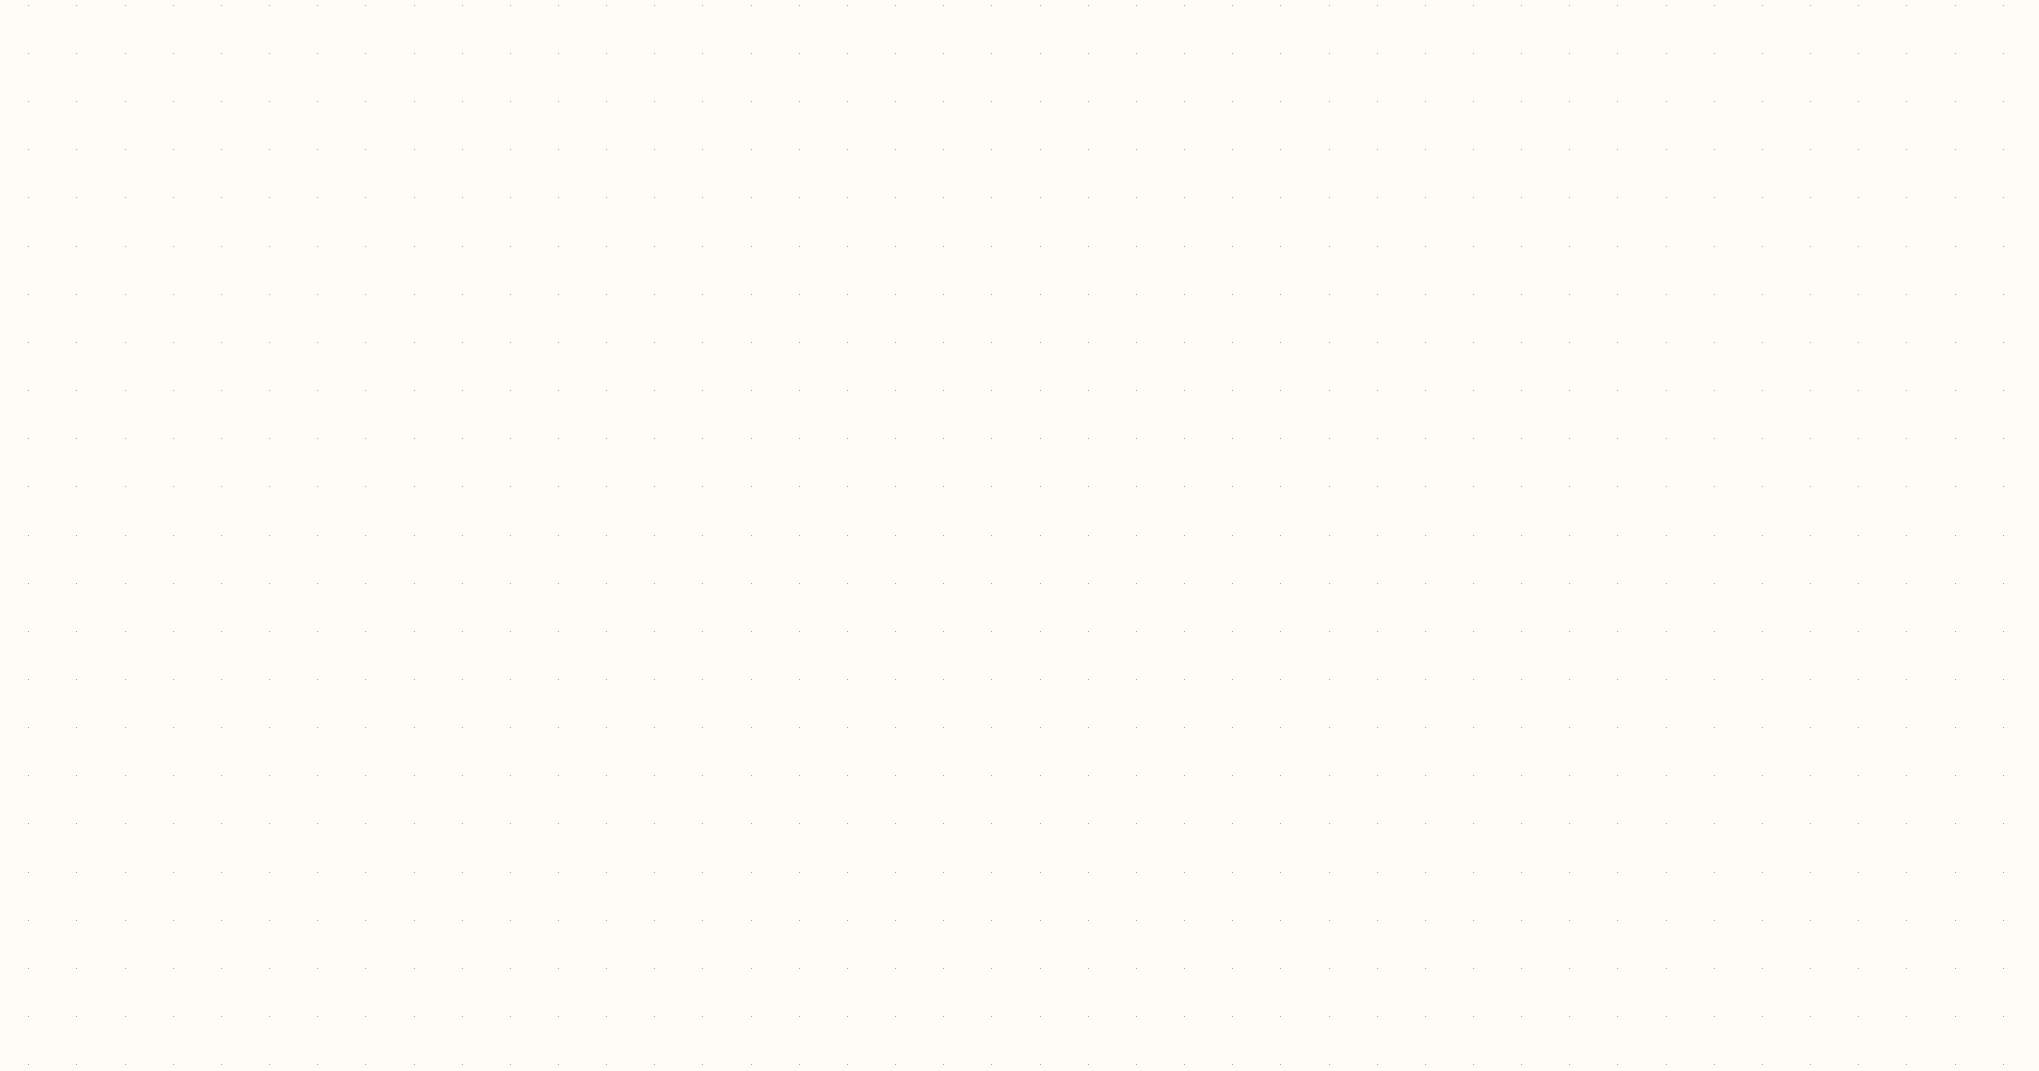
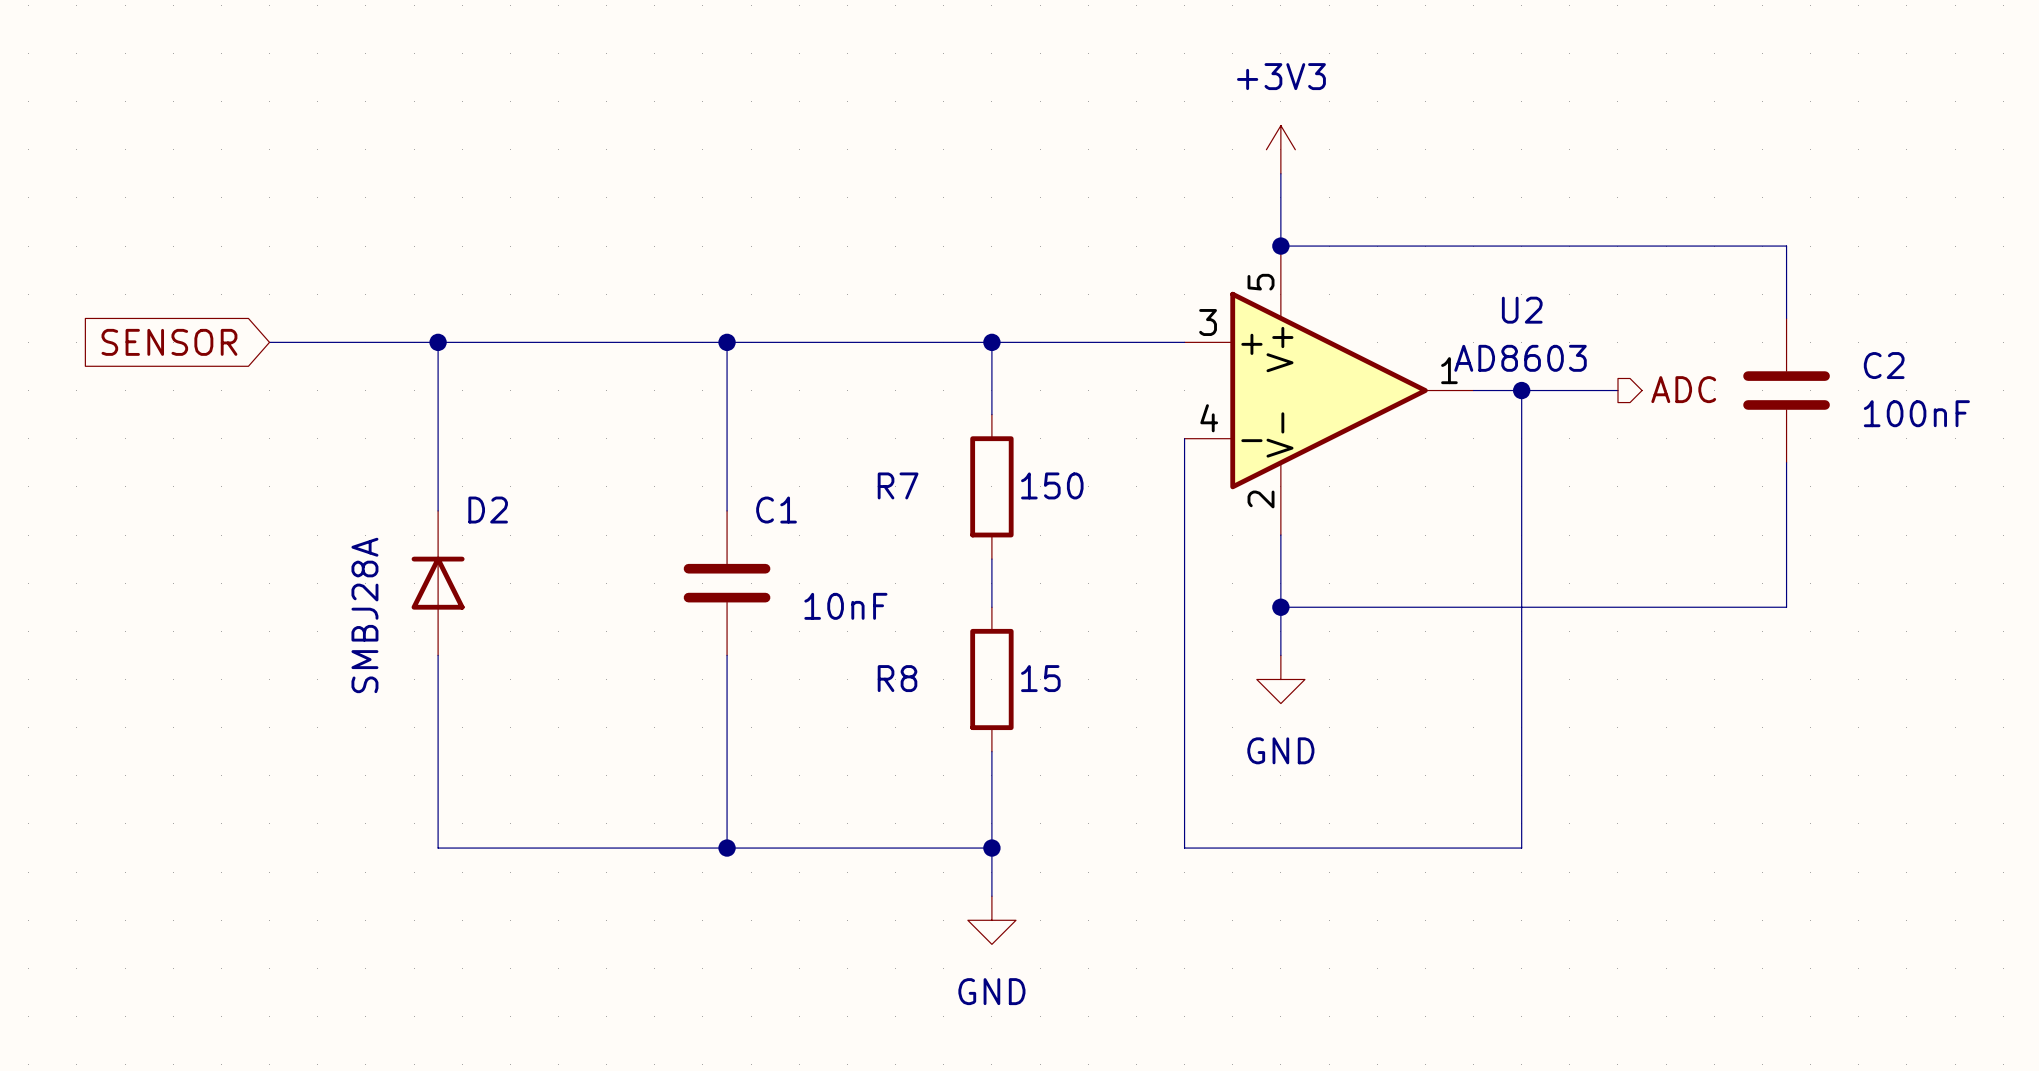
power symbol: none -> +3V3 (1280, 149)
wire: none -> (1280, 173) (1280, 246) (1786, 246) (1786, 318)
junction: none -> (1280, 246)
global label: none -> SENSOR (169, 342)
wire: none -> (269, 342) (1184, 342)
wire: none -> (438, 342) (438, 510)
junction: none -> (438, 342)
wire: none -> (727, 342) (727, 510)
junction: none -> (727, 342)
wire: none -> (991, 342) (991, 414)
junction: none -> (991, 342)
hierarchical label: none -> ADC (1683, 389)
U2: none -> AD8603 (1329, 390)
wire: none -> (1473, 390) (1617, 390)
wire: none -> (1521, 390) (1521, 848) (1184, 848) (1184, 438)
junction: none -> (1521, 390)
C2: none -> 100nF (1786, 390)
wire: none -> (1786, 462) (1786, 607) (1280, 607)
R7: none -> 150 (991, 486)
wire: none -> (1280, 535) (1280, 655)
wire: none -> (991, 559) (991, 607)
D2: none -> SMBJ28A (438, 583)
C1: none -> 10nF (727, 583)
junction: none -> (1280, 607)
wire: none -> (438, 655) (438, 848) (991, 848)
wire: none -> (727, 655) (727, 848)
R8: none -> 15 (991, 679)
power symbol: none -> GND (1280, 679)
wire: none -> (991, 751) (991, 896)
junction: none -> (727, 848)
junction: none -> (991, 848)
power symbol: none -> GND (991, 920)

